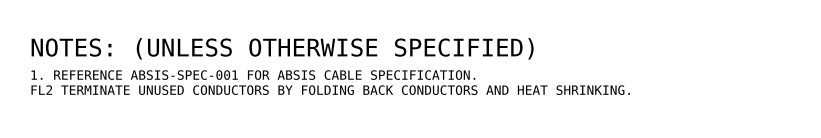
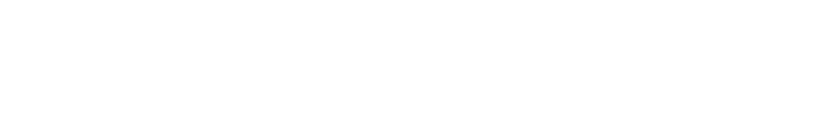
text: NOTES: (UNLESS OTHERWISE SPECIFIED) (282, 48) -> none
text: 1. REFERENCE ABSIS-SPEC-001 FOR ABSIS CABLE SPECIFICATION. (253, 75) -> none
text: FL2 TERMINATE UNUSED CONDUCTORS BY FOLDING BACK CONDUCTORS AND HEAT SHRINKING. (330, 90) -> none

